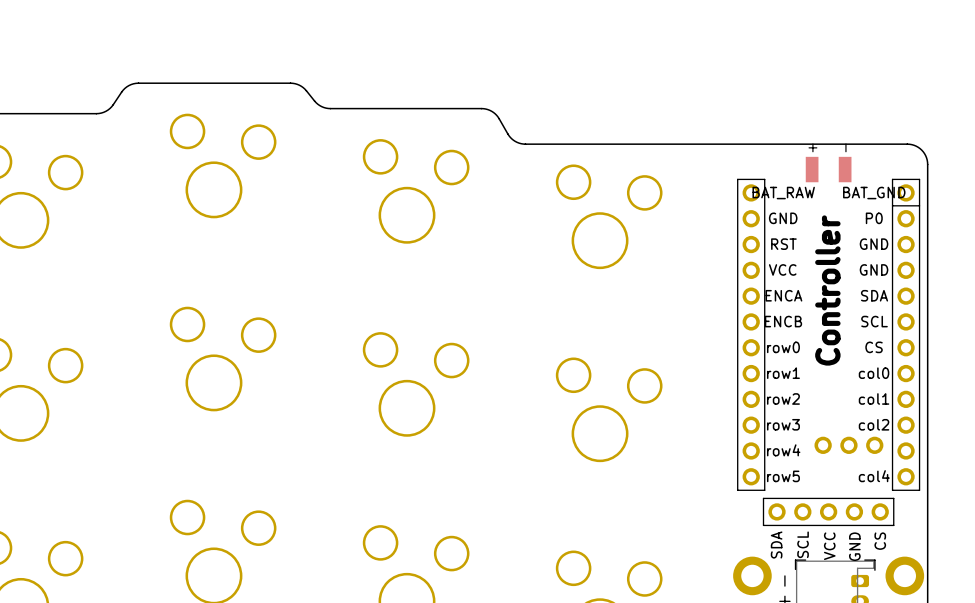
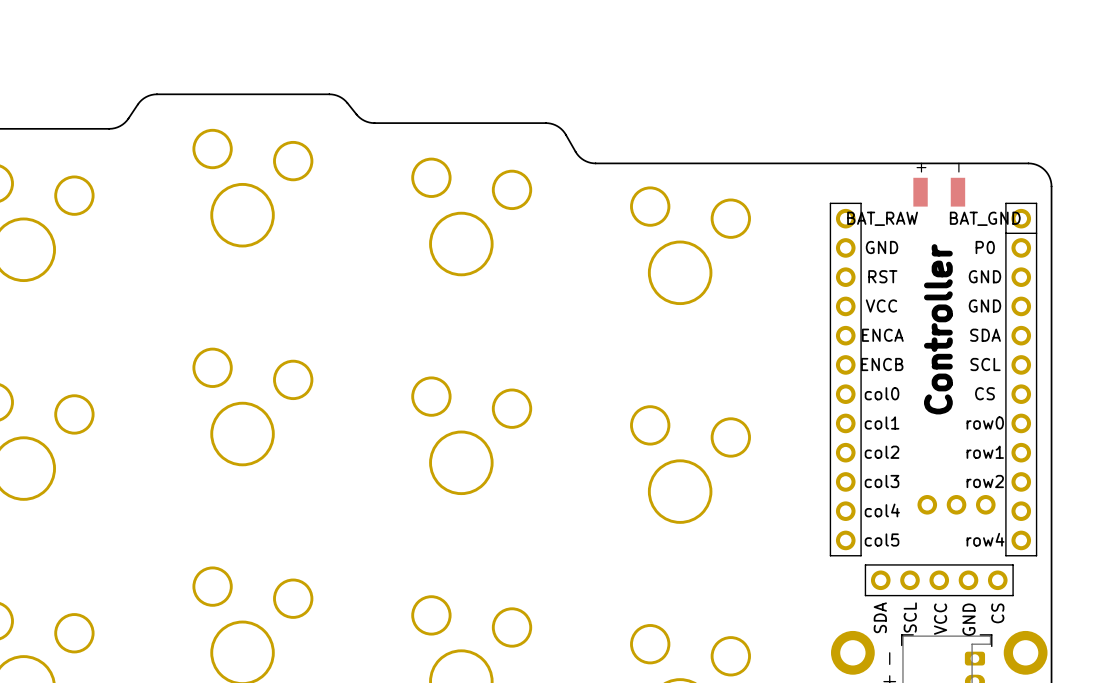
part footprint: [737, 178, 921, 491] -> [829, 202, 1038, 557]

